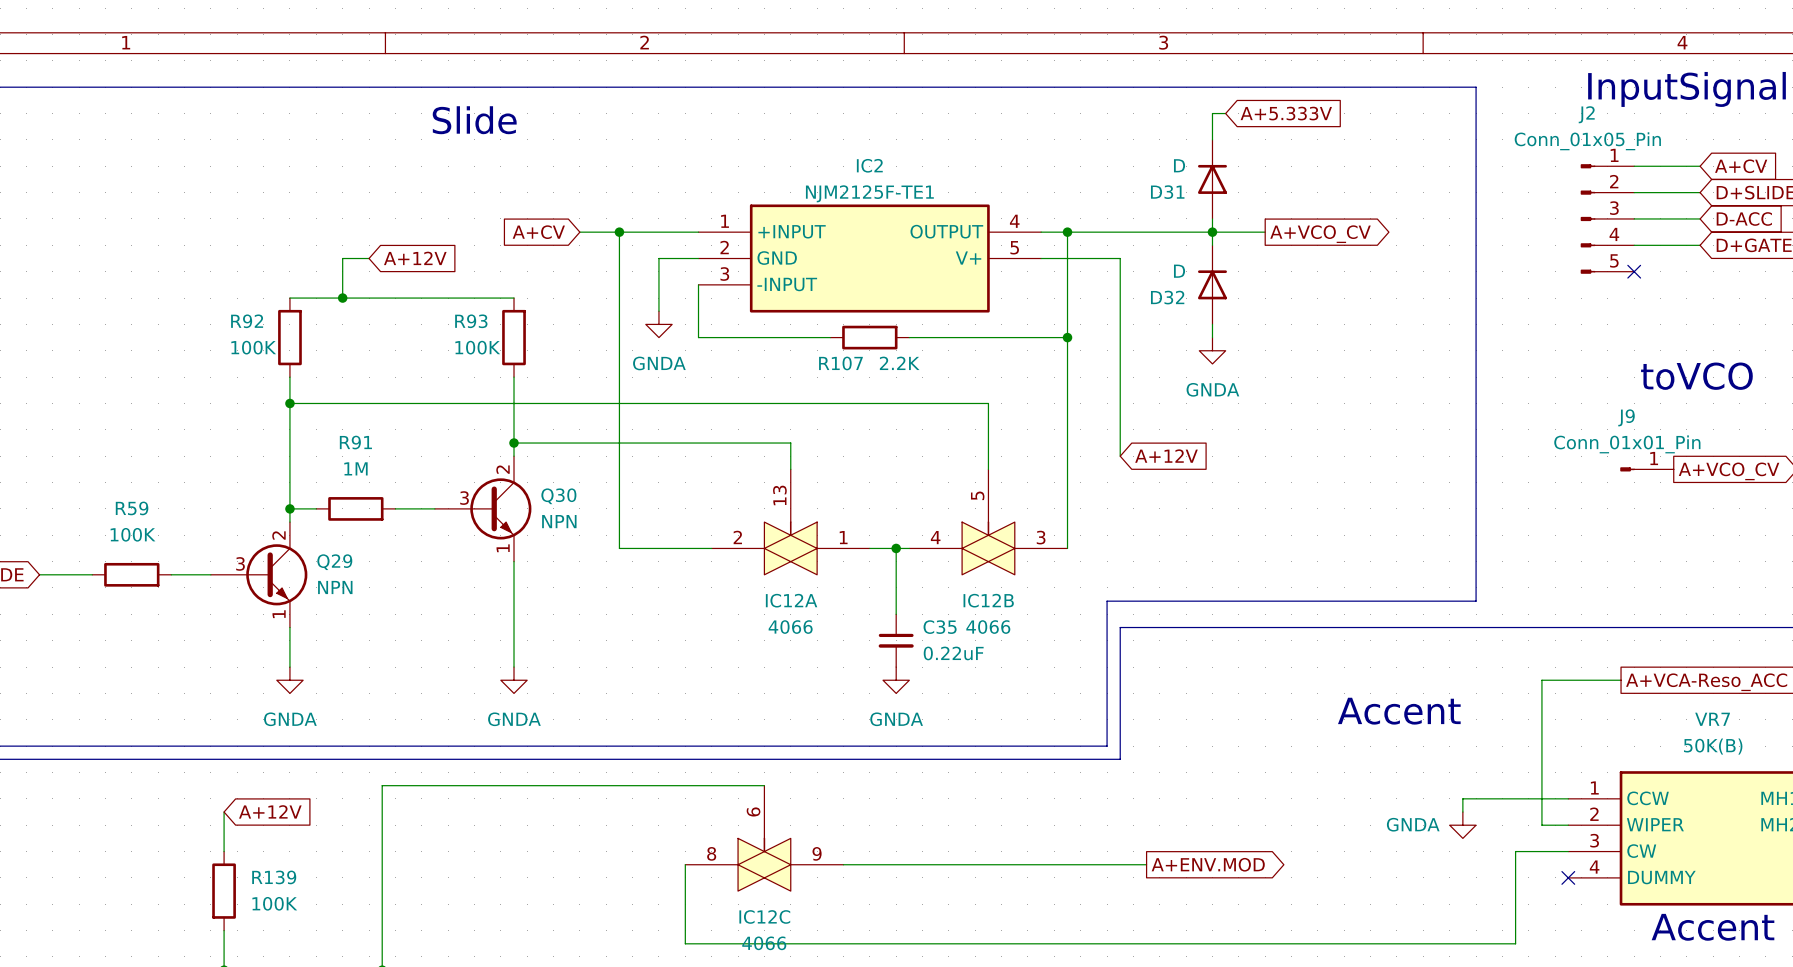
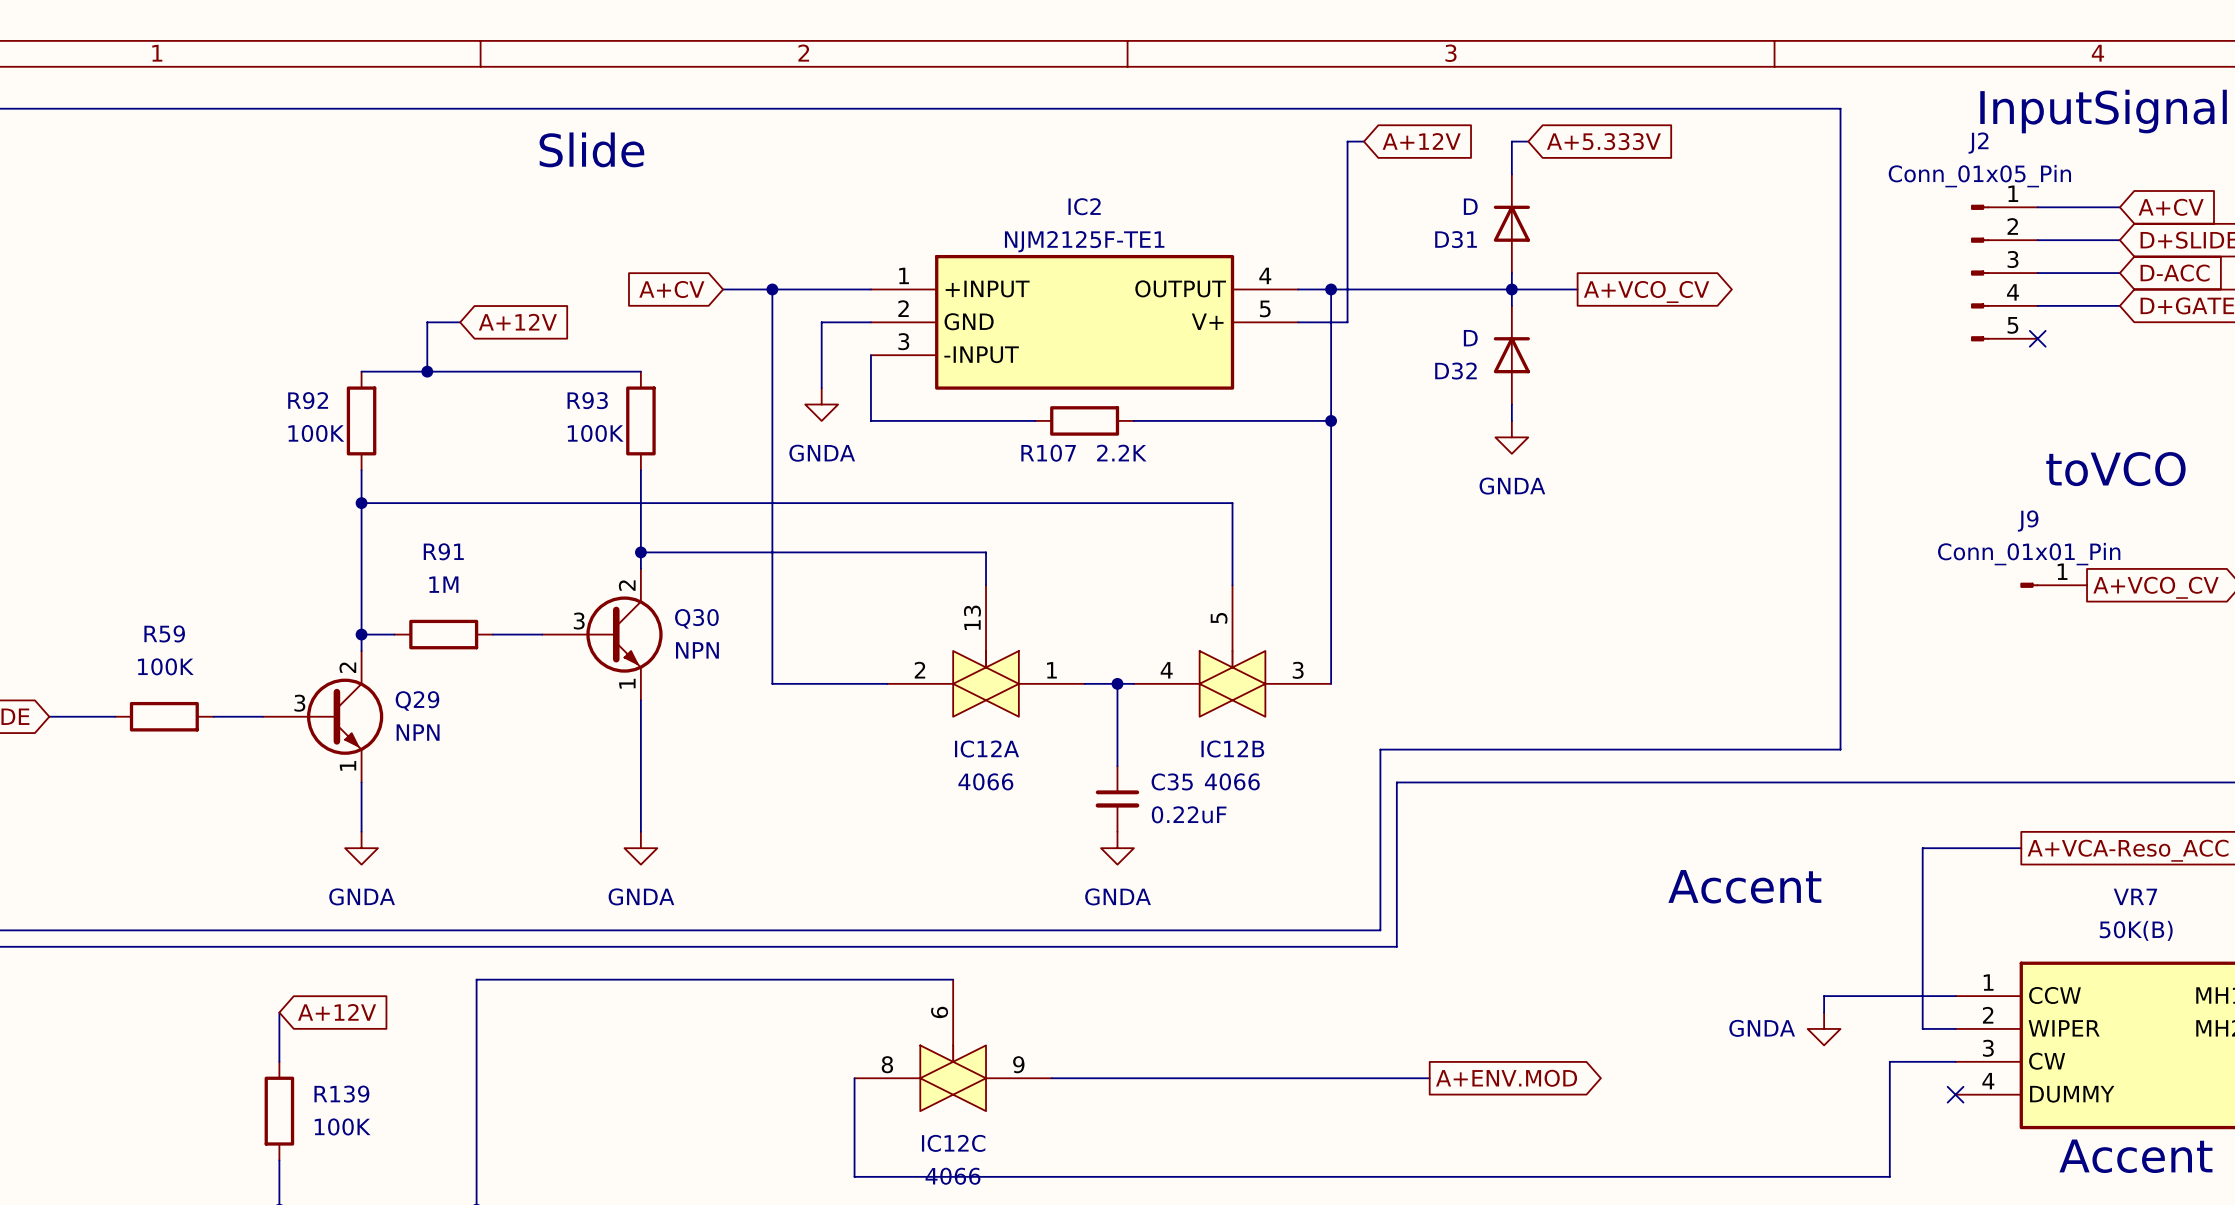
global label: none -> A+12V (1421, 141)
wire: (1080, 258) (1120, 258) (1120, 456) -> (1347, 322) (1347, 141) (1363, 141)
global label: A+12V (1166, 456) -> none

